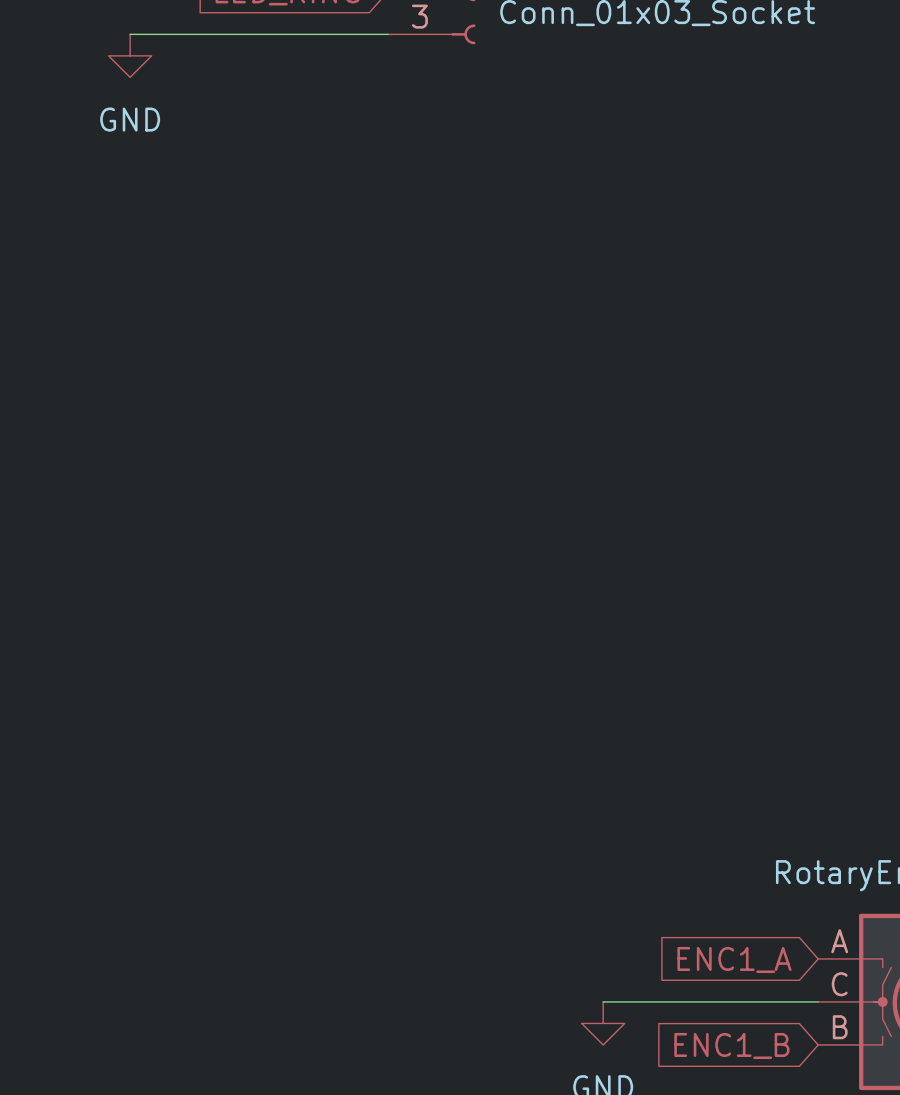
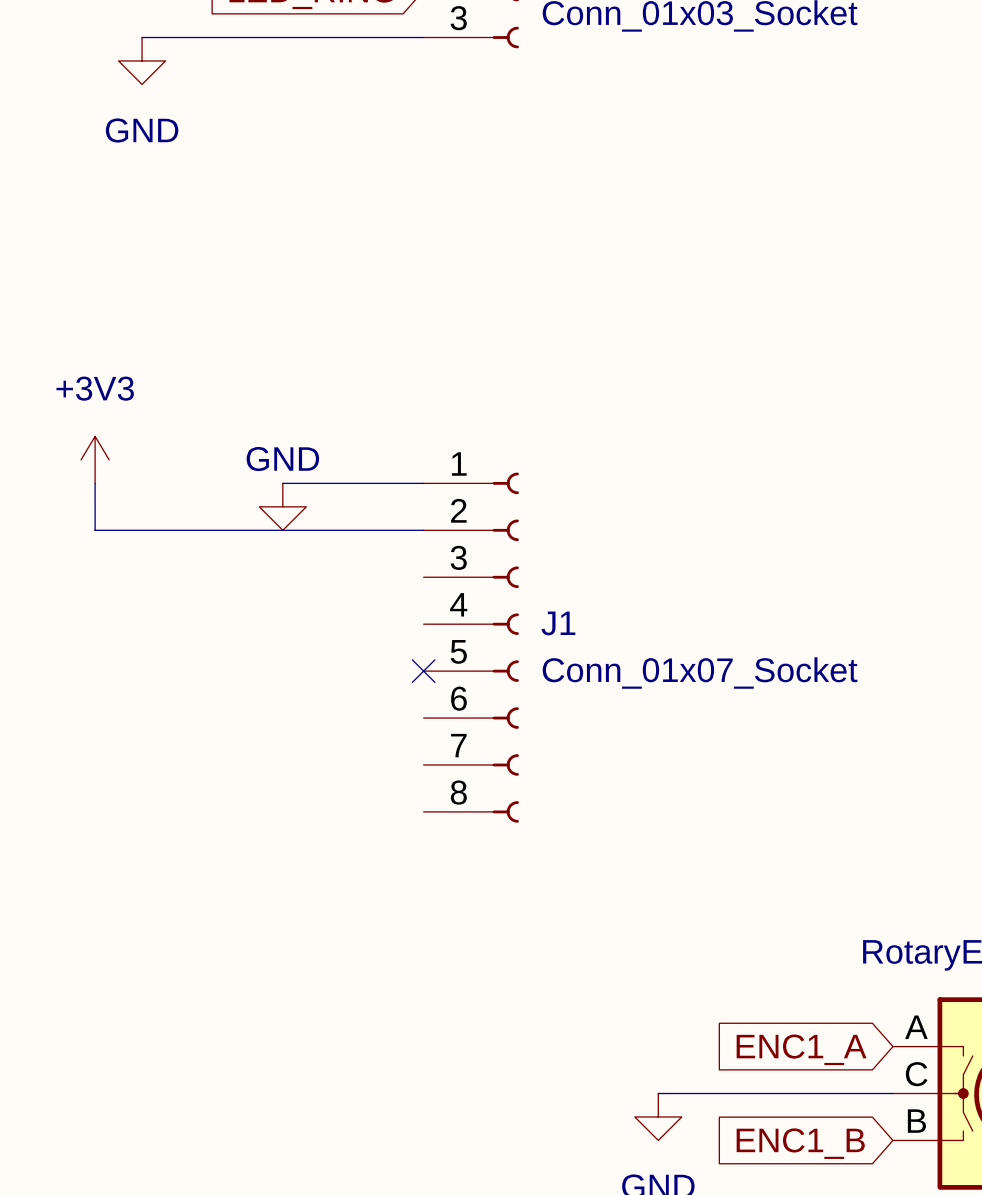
power symbol: none -> +3V3 (95, 459)
wire: none -> (95, 483) (95, 530) (423, 530)
wire: none -> (282, 483) (423, 483)
power symbol: none -> GND (282, 506)
J1: none -> Conn_01x07_Socket (471, 647)
no-connect mark: none -> (423, 671)

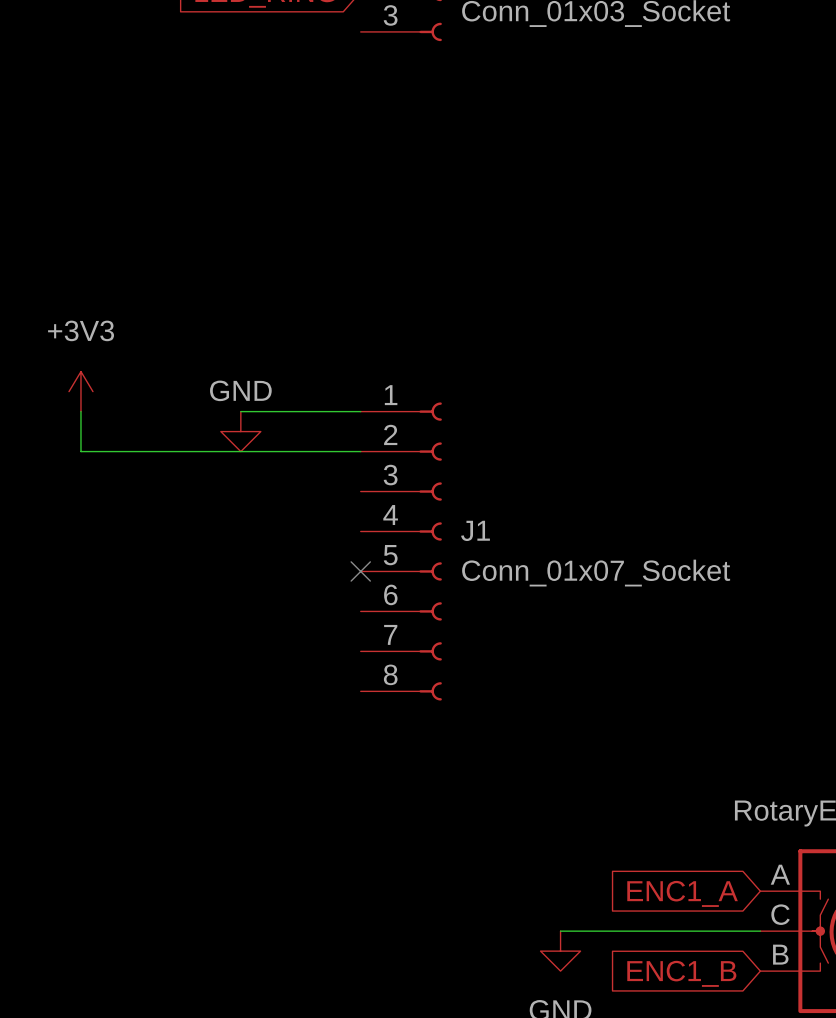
wire: (142, 37) (423, 37) -> none
power symbol: GND (142, 60) -> none

